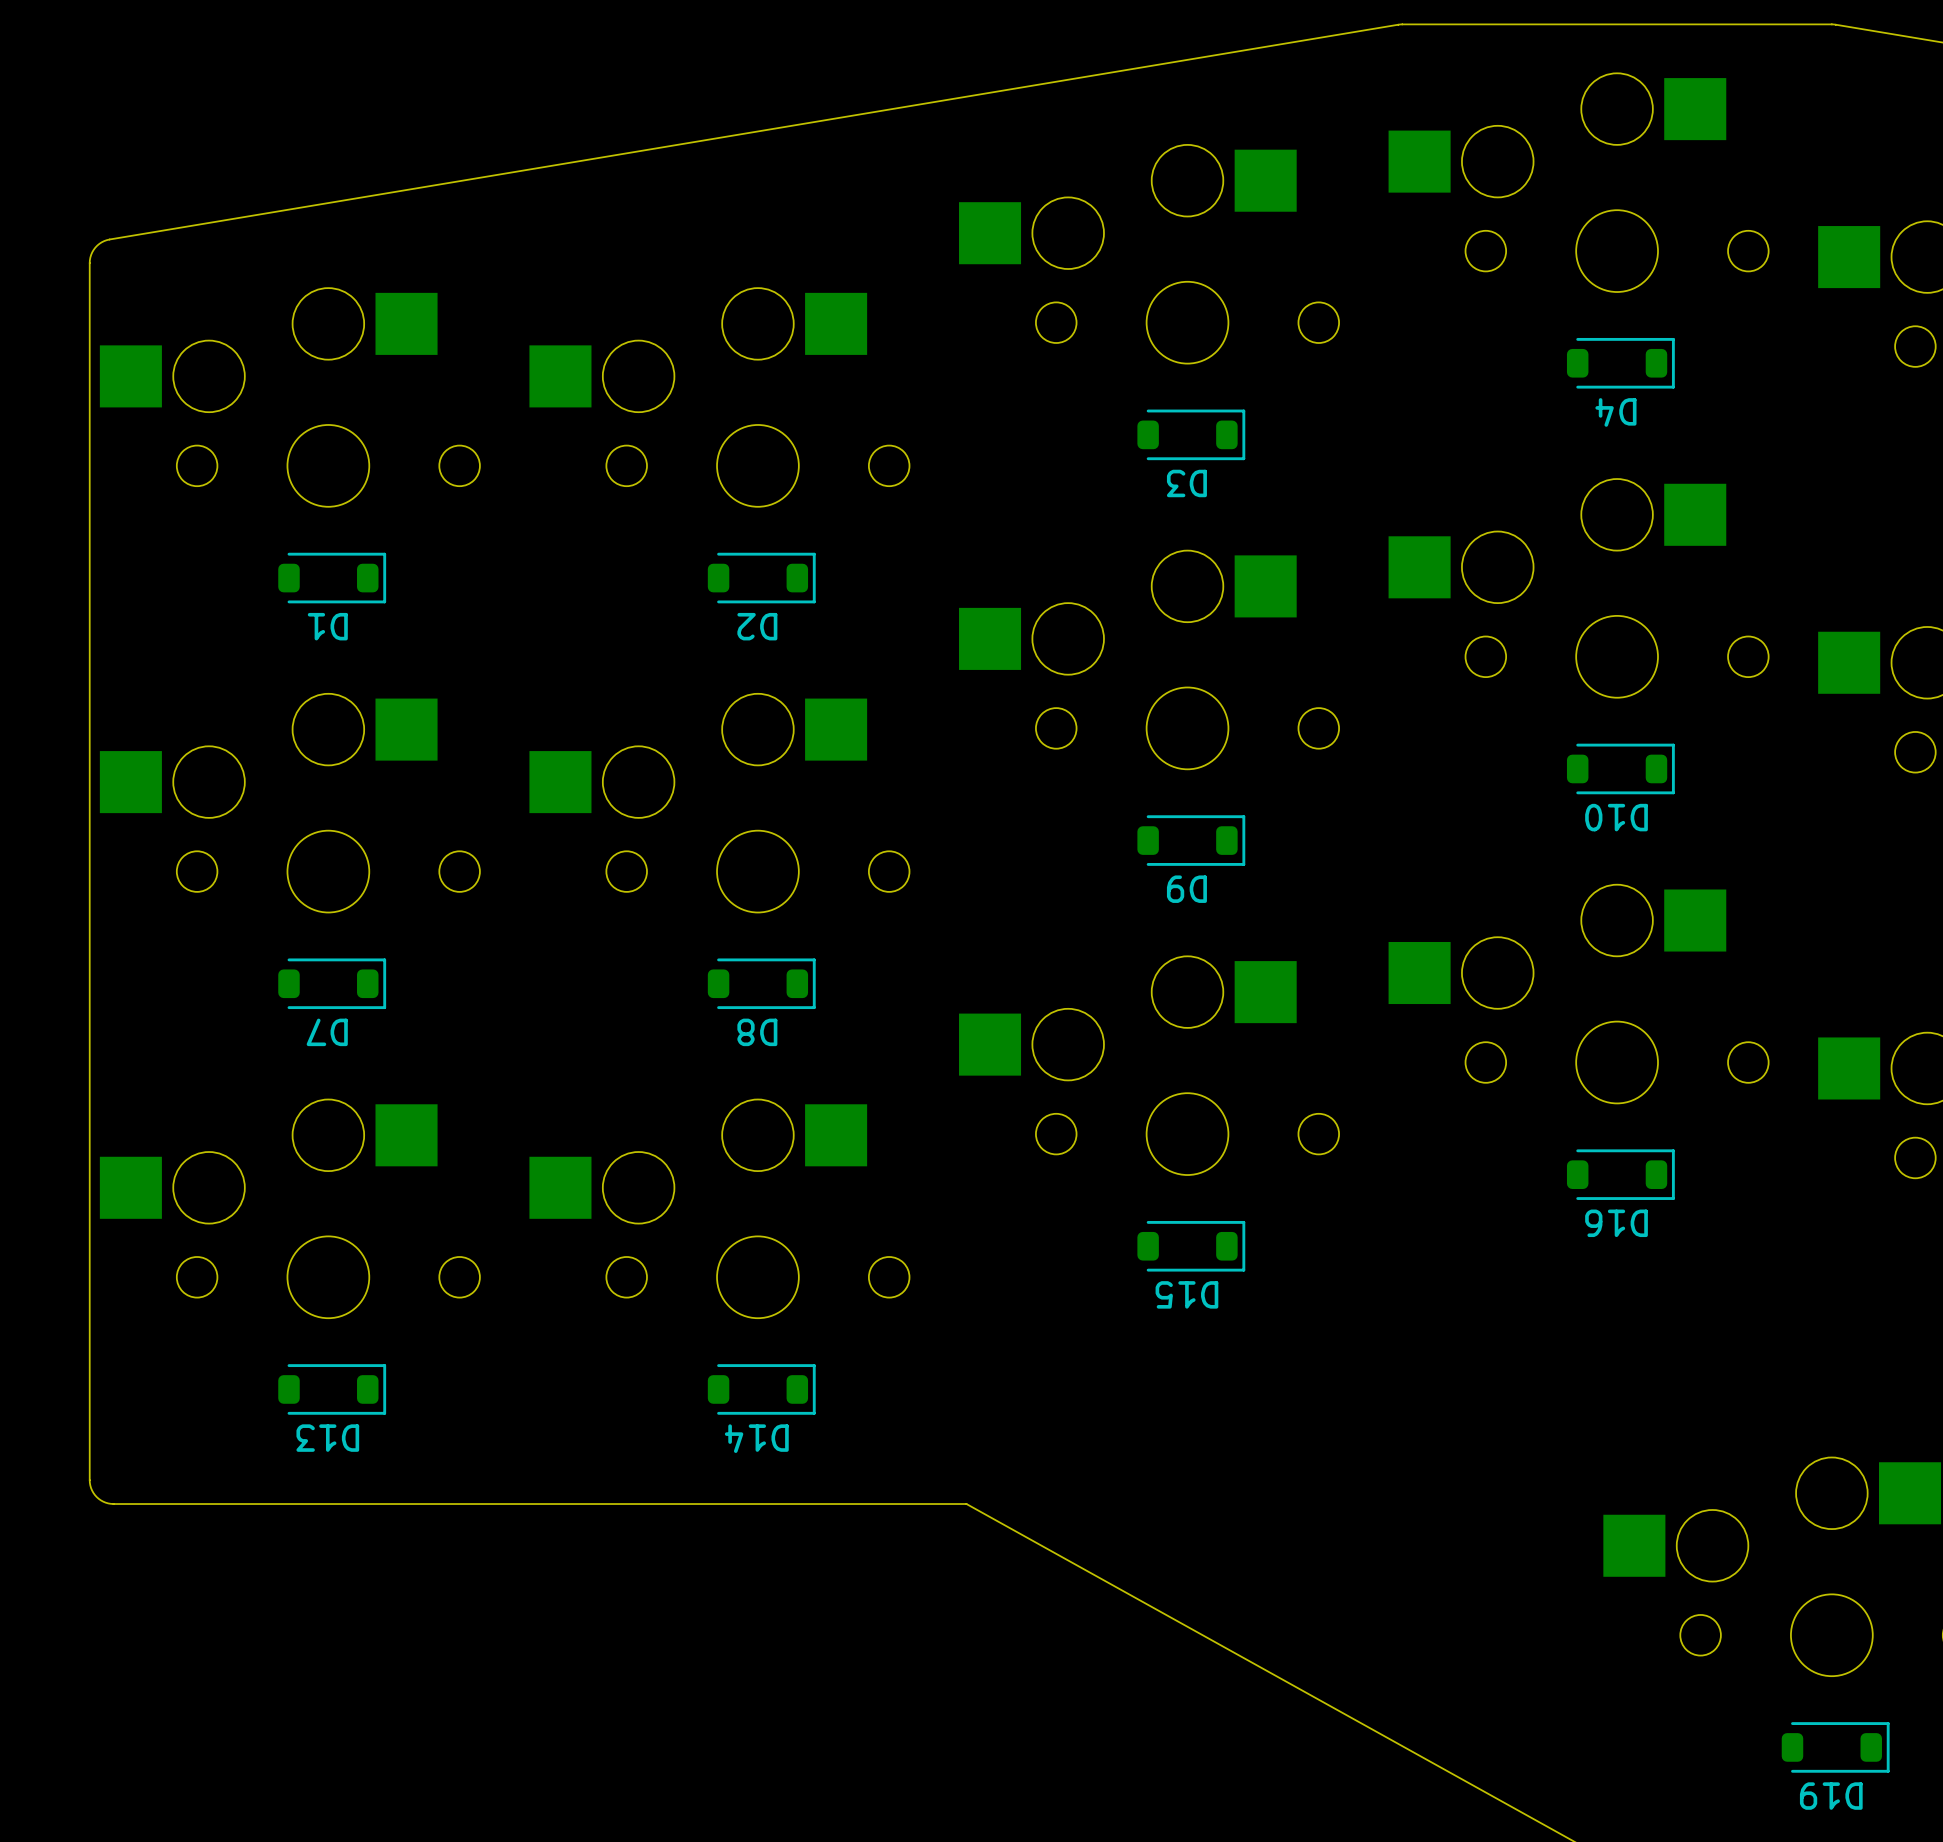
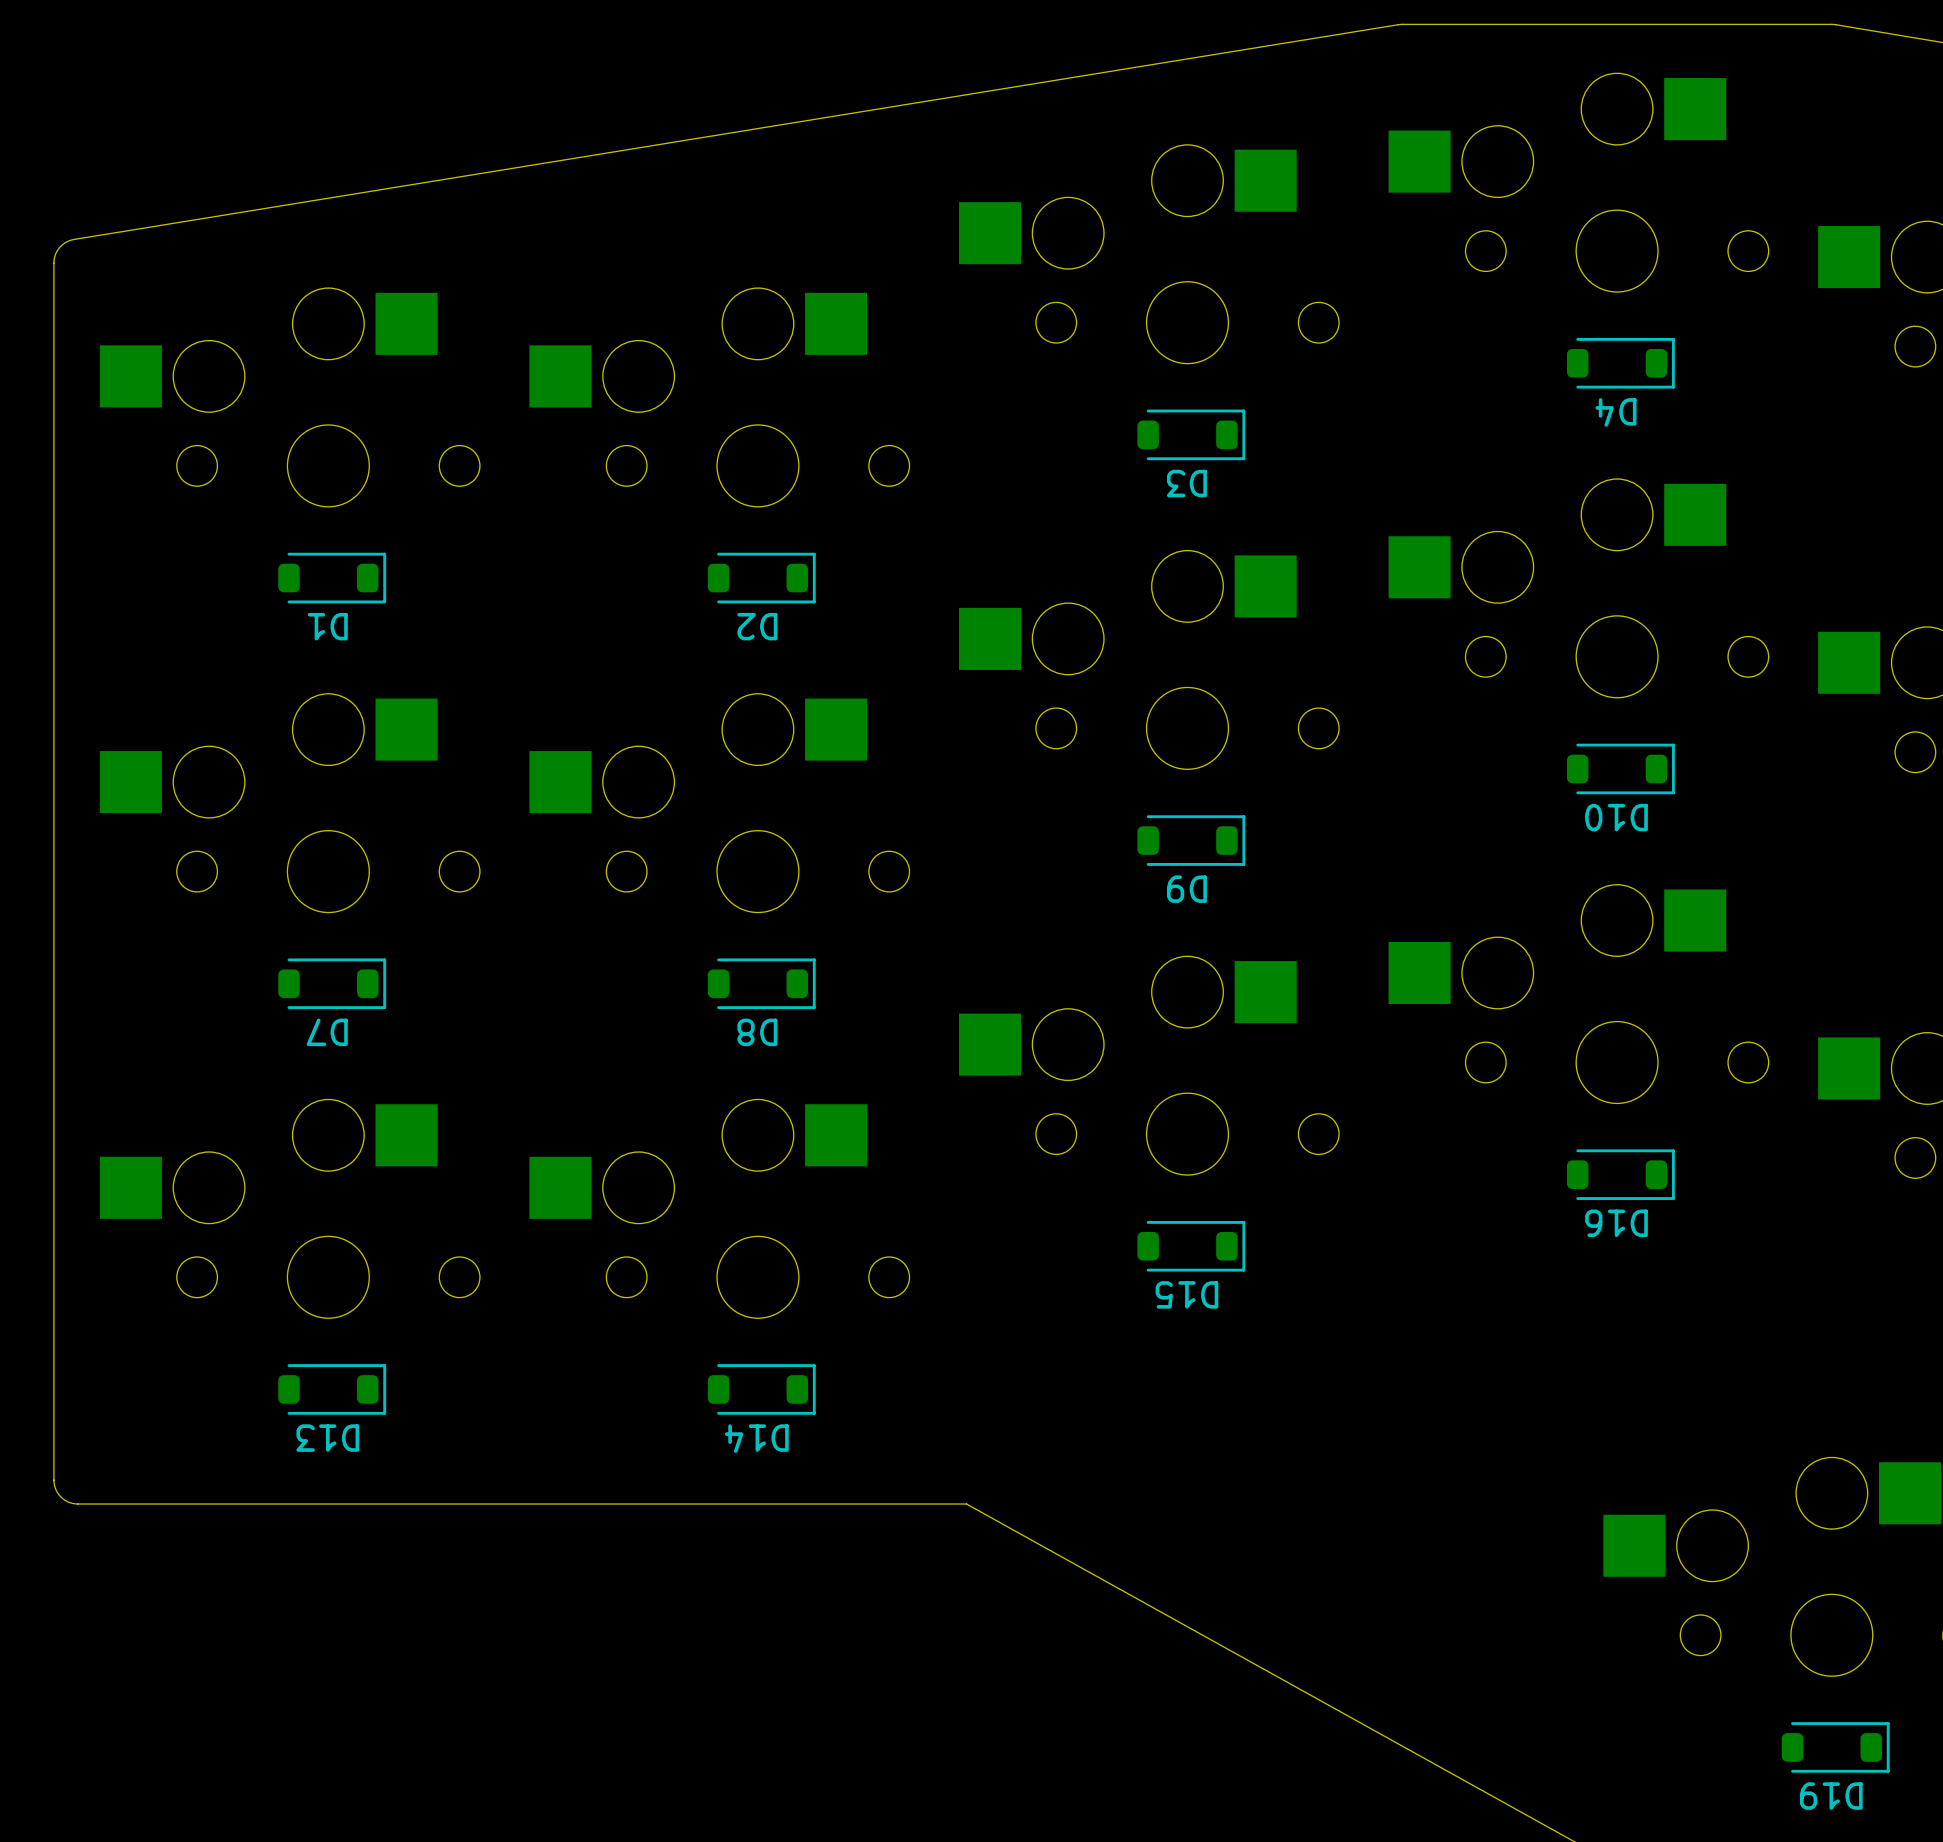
board edge: (1398, 24) (109, 239) (95, 247) (89, 263) (89, 1480) (92, 1490) (96, 1497) (105, 1502) (113, 1504) -> (1398, 24) (73, 239) (59, 247) (53, 263) (53, 1480) (57, 1492) (69, 1502) (113, 1504)

